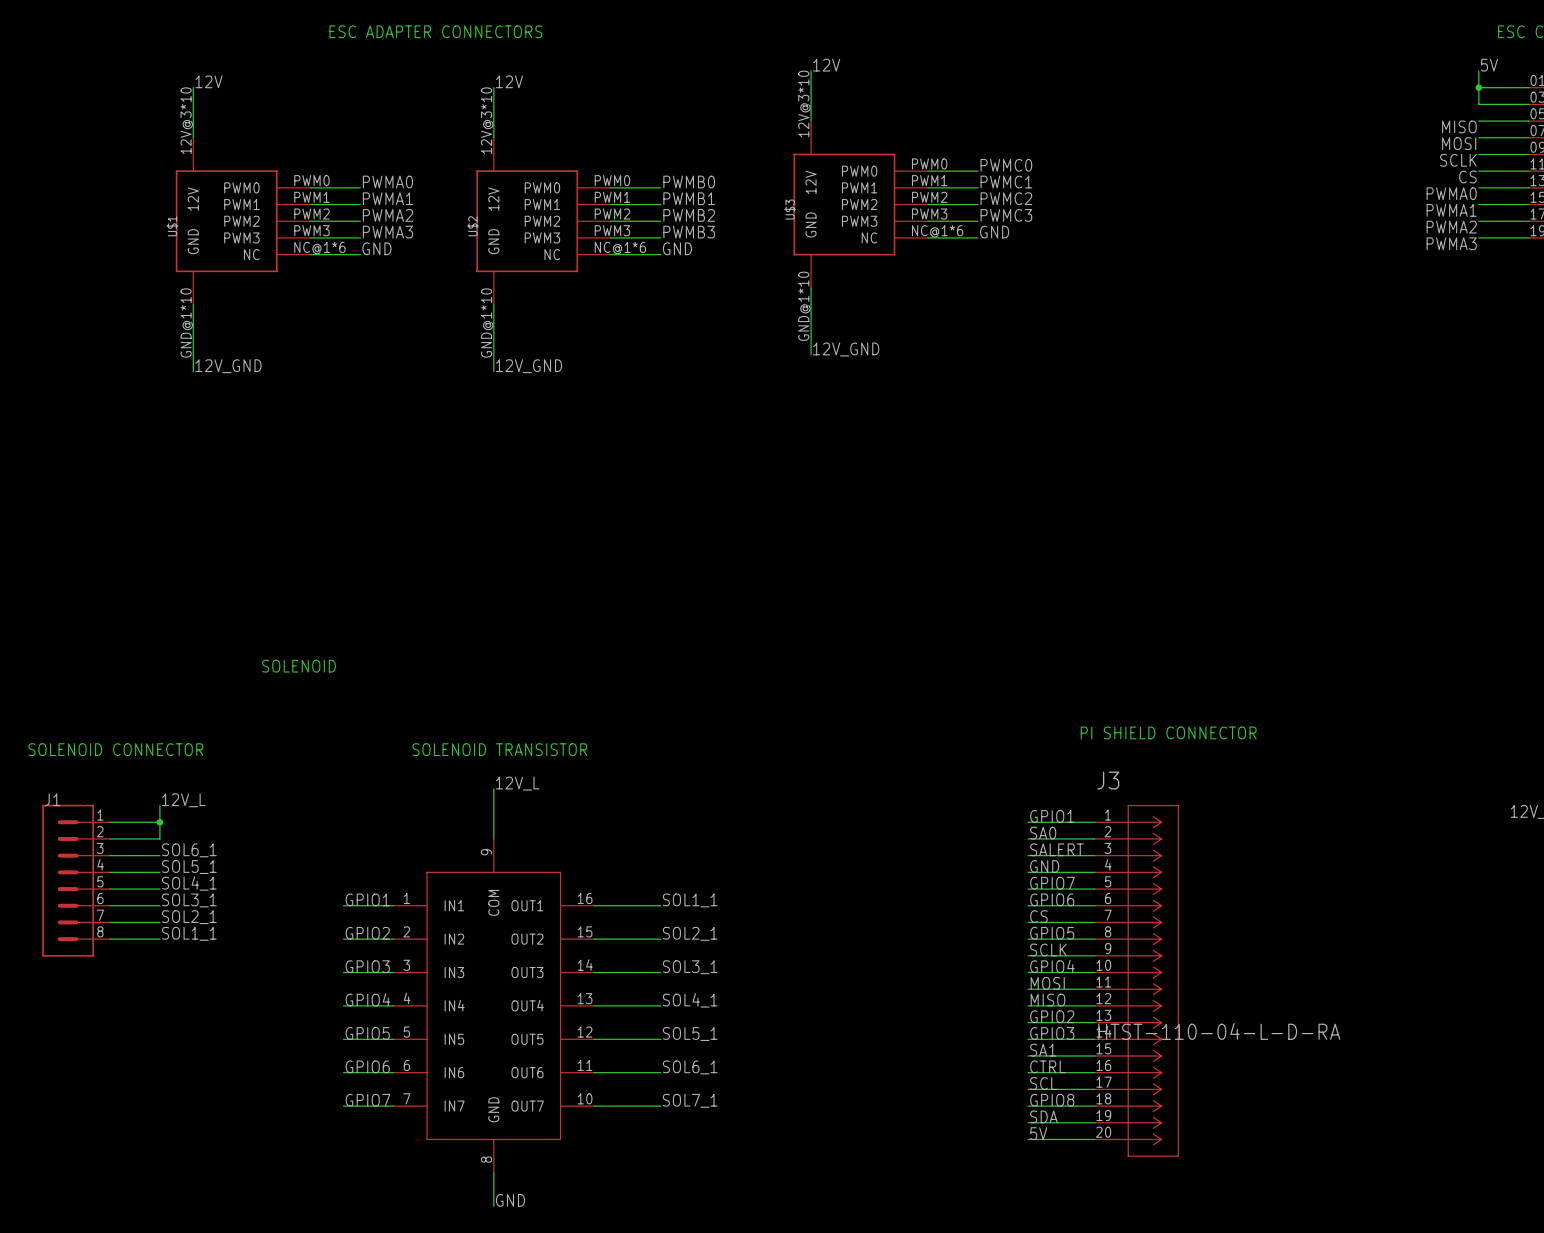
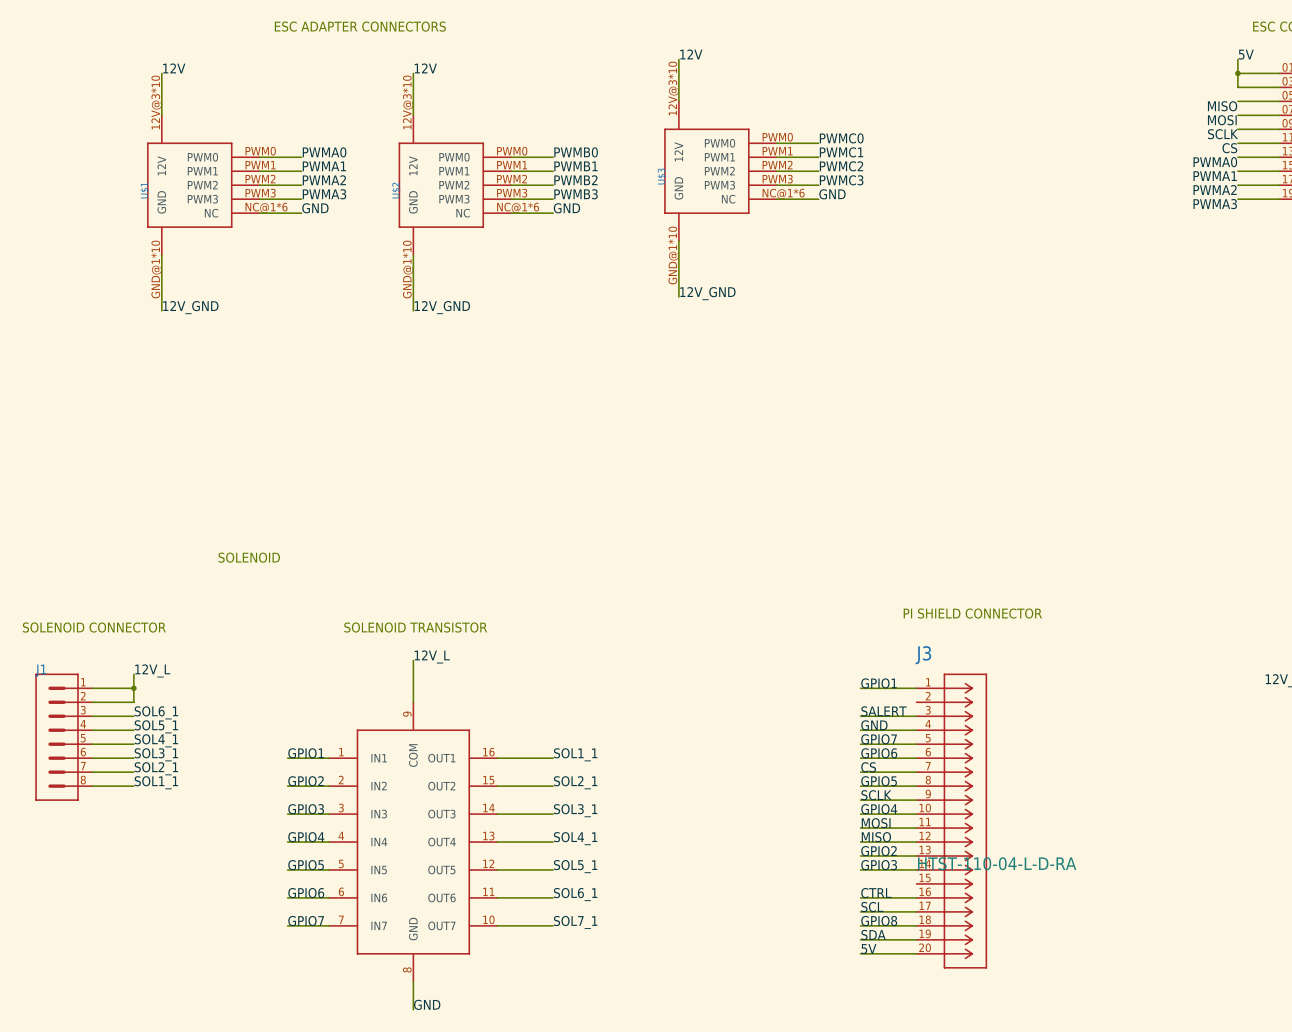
label: SA0 (1043, 833) -> none
wire: (1028, 838) (1094, 838) -> none
label: SA1 (1043, 1050) -> none
wire: (1028, 1055) (1094, 1055) -> none

